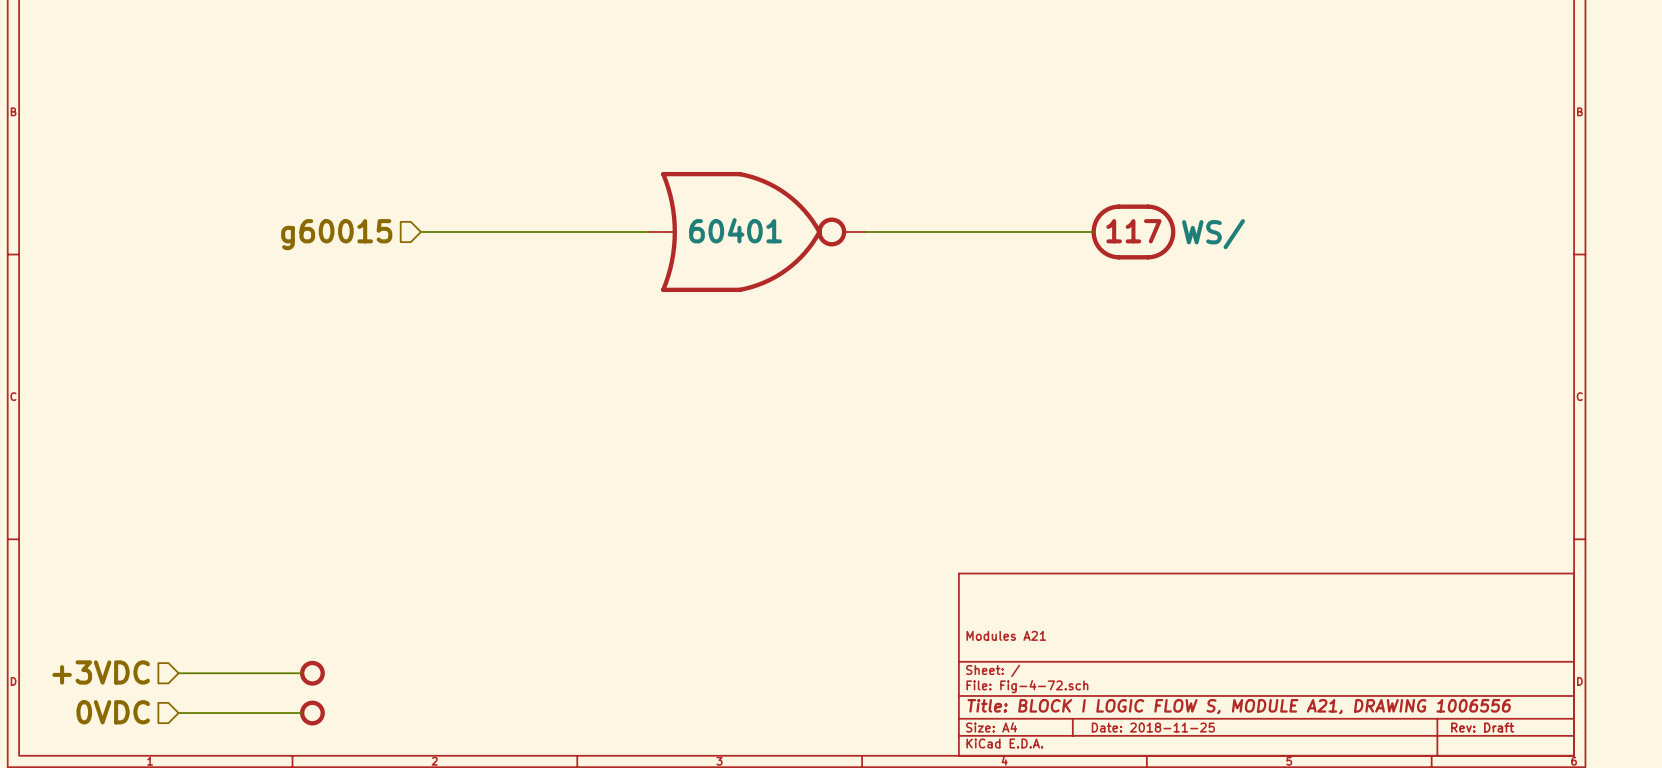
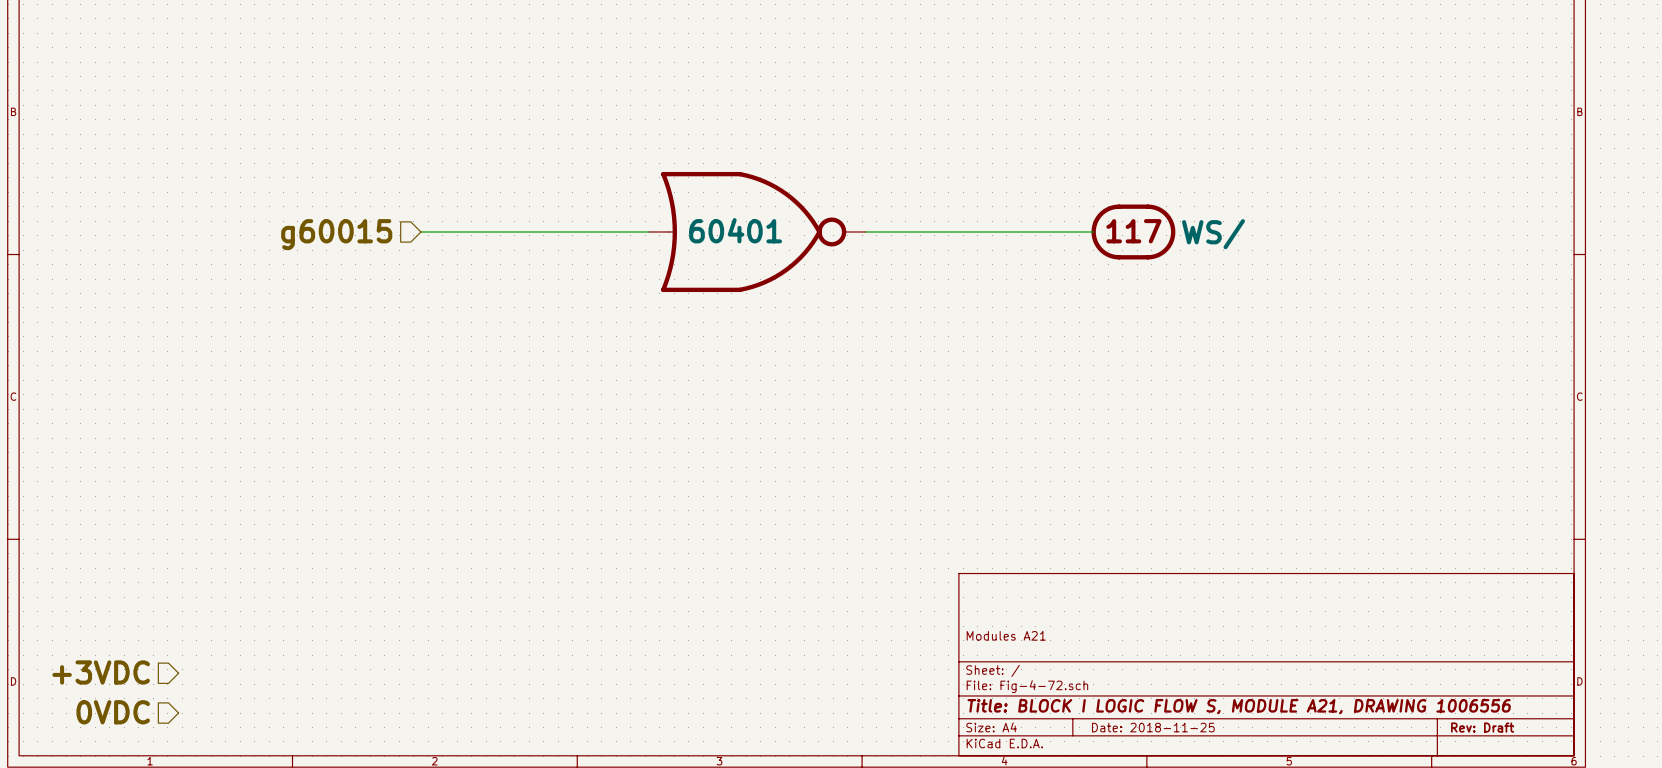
wire: (178, 673) (301, 673) -> none
part: (312, 673) -> none
wire: (178, 713) (301, 713) -> none
part: (312, 713) -> none

